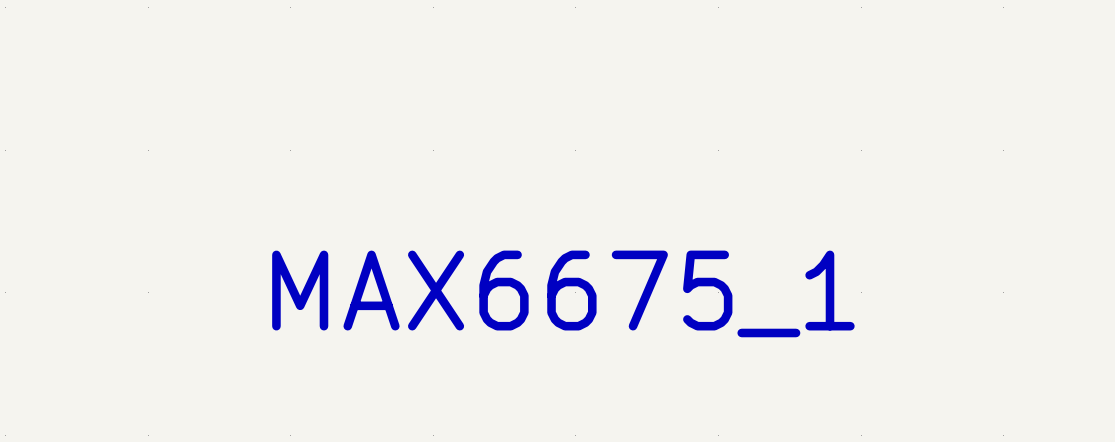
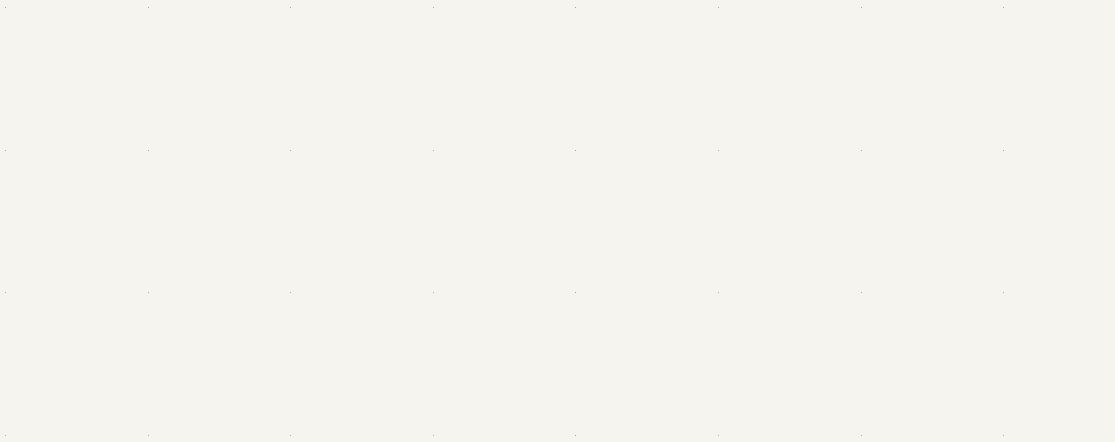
text: MAX6675_1 (563, 293) -> none

